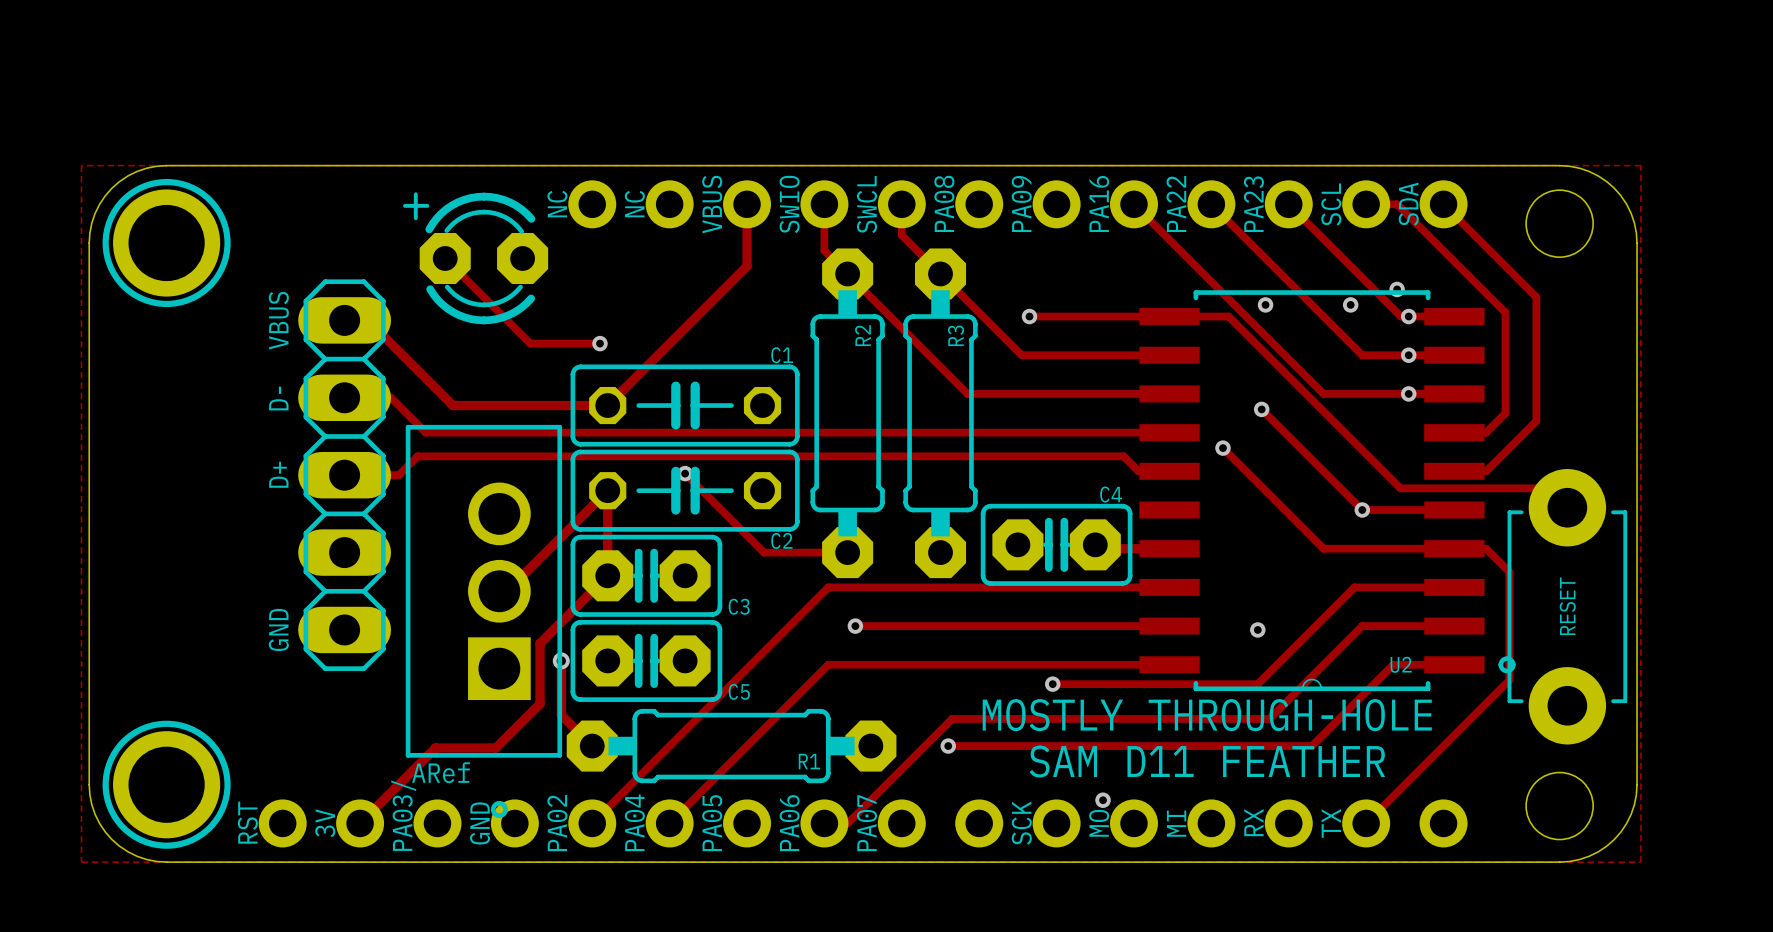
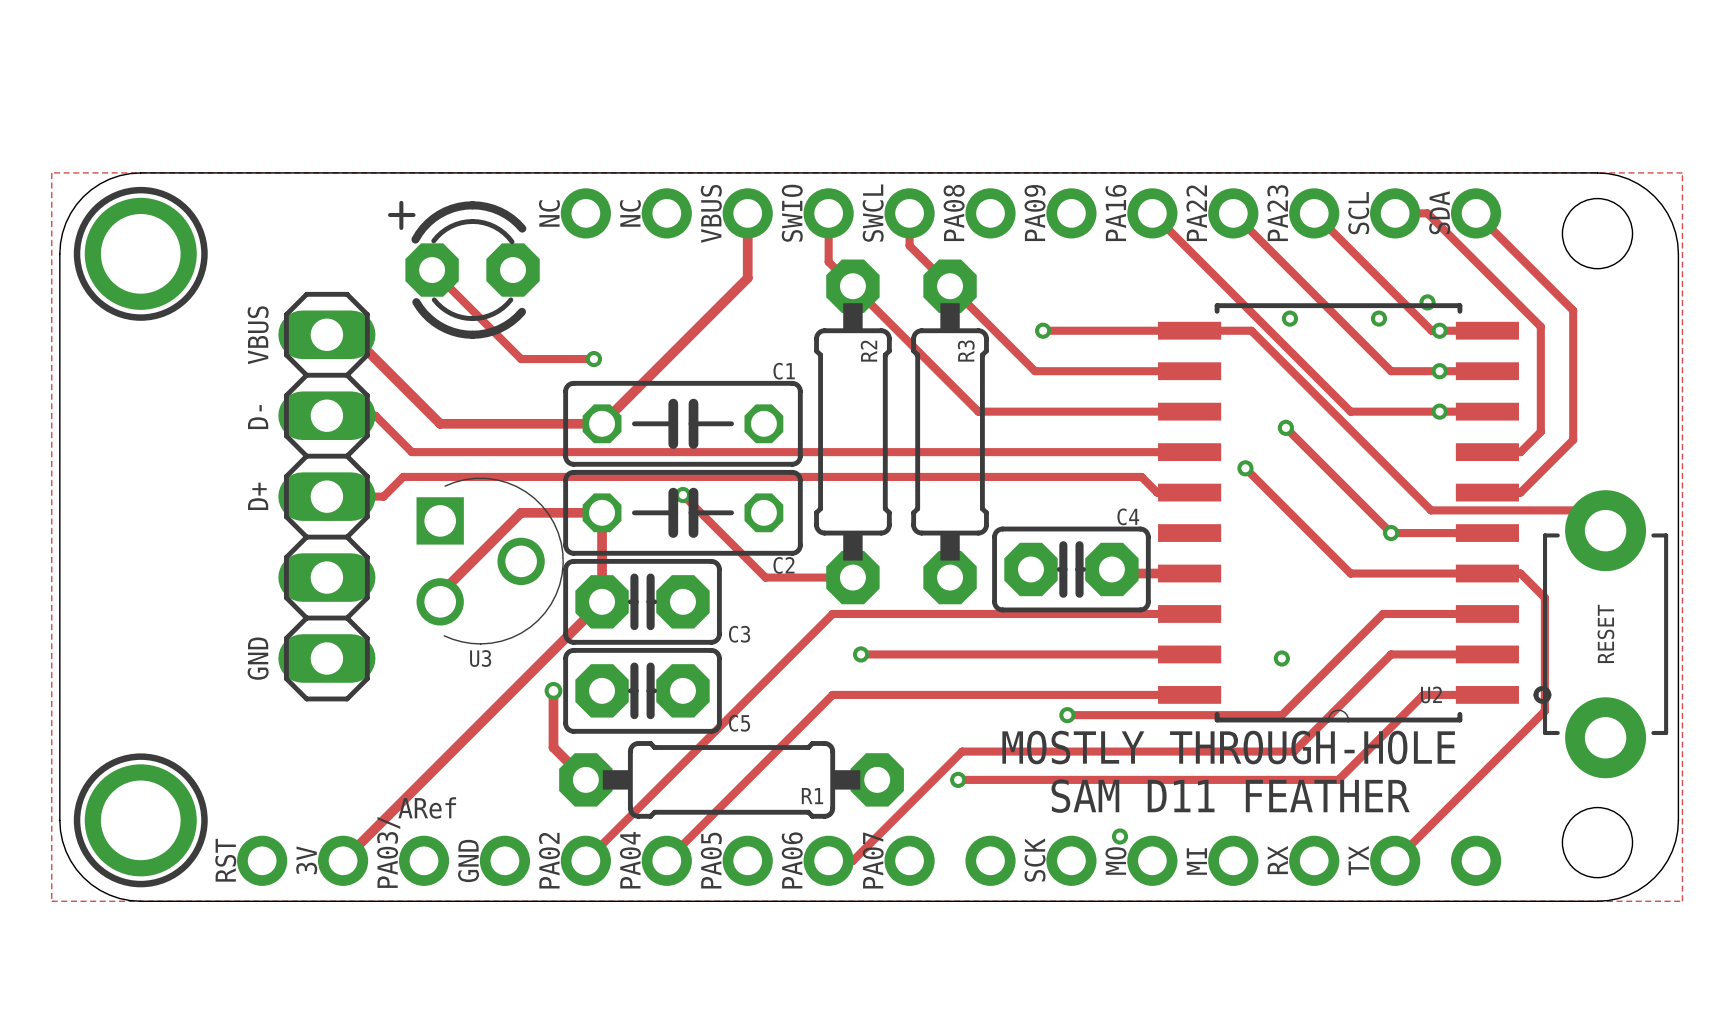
track: (607, 490) (507, 591) (499, 591) -> (602, 512) (521, 512) (440, 593) (440, 601)
U3: none -> (489, 561)
part: (483, 621) -> none
track: (540, 643) (540, 703) (495, 747) (435, 747) -> (531, 672) (421, 781)

